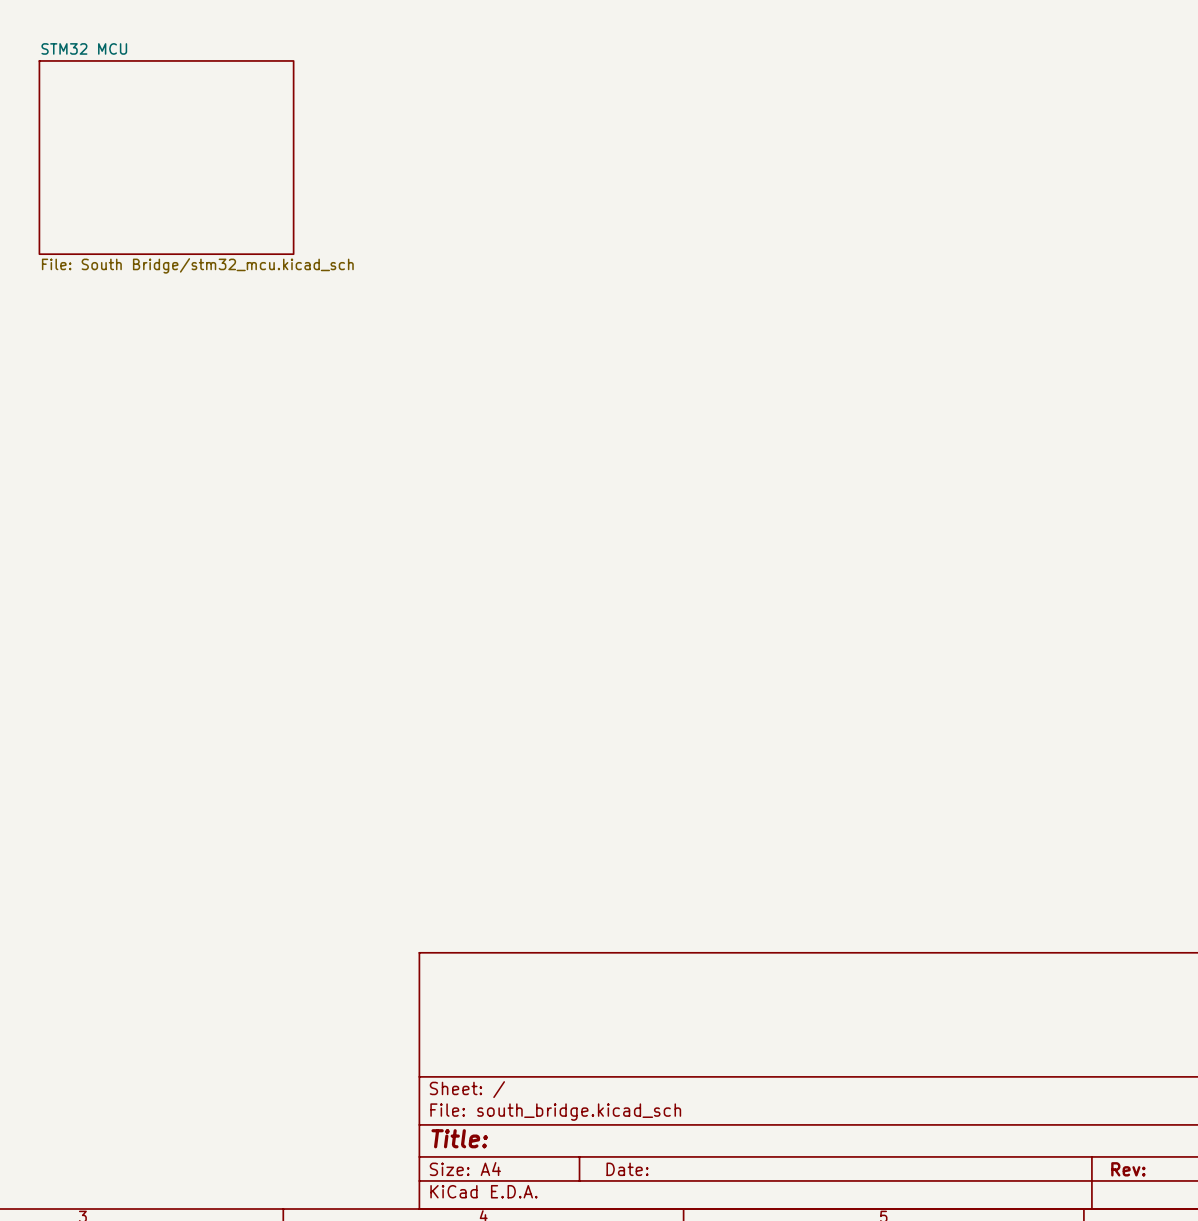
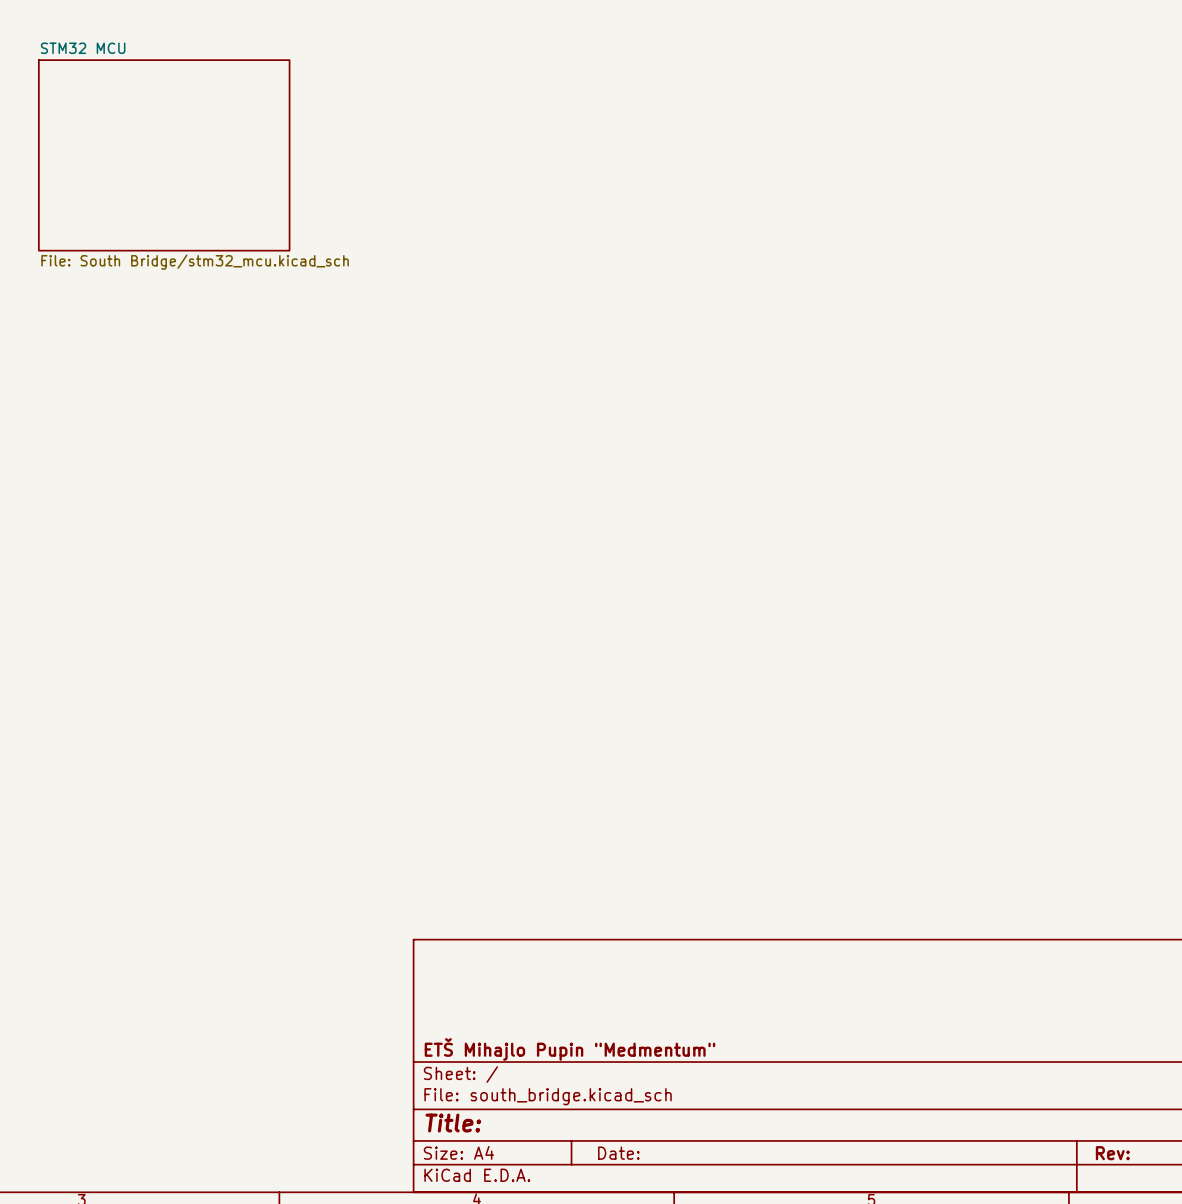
title block: none -> ETŠ Mihajlo Pupin "Medmentum" (569, 1049)

